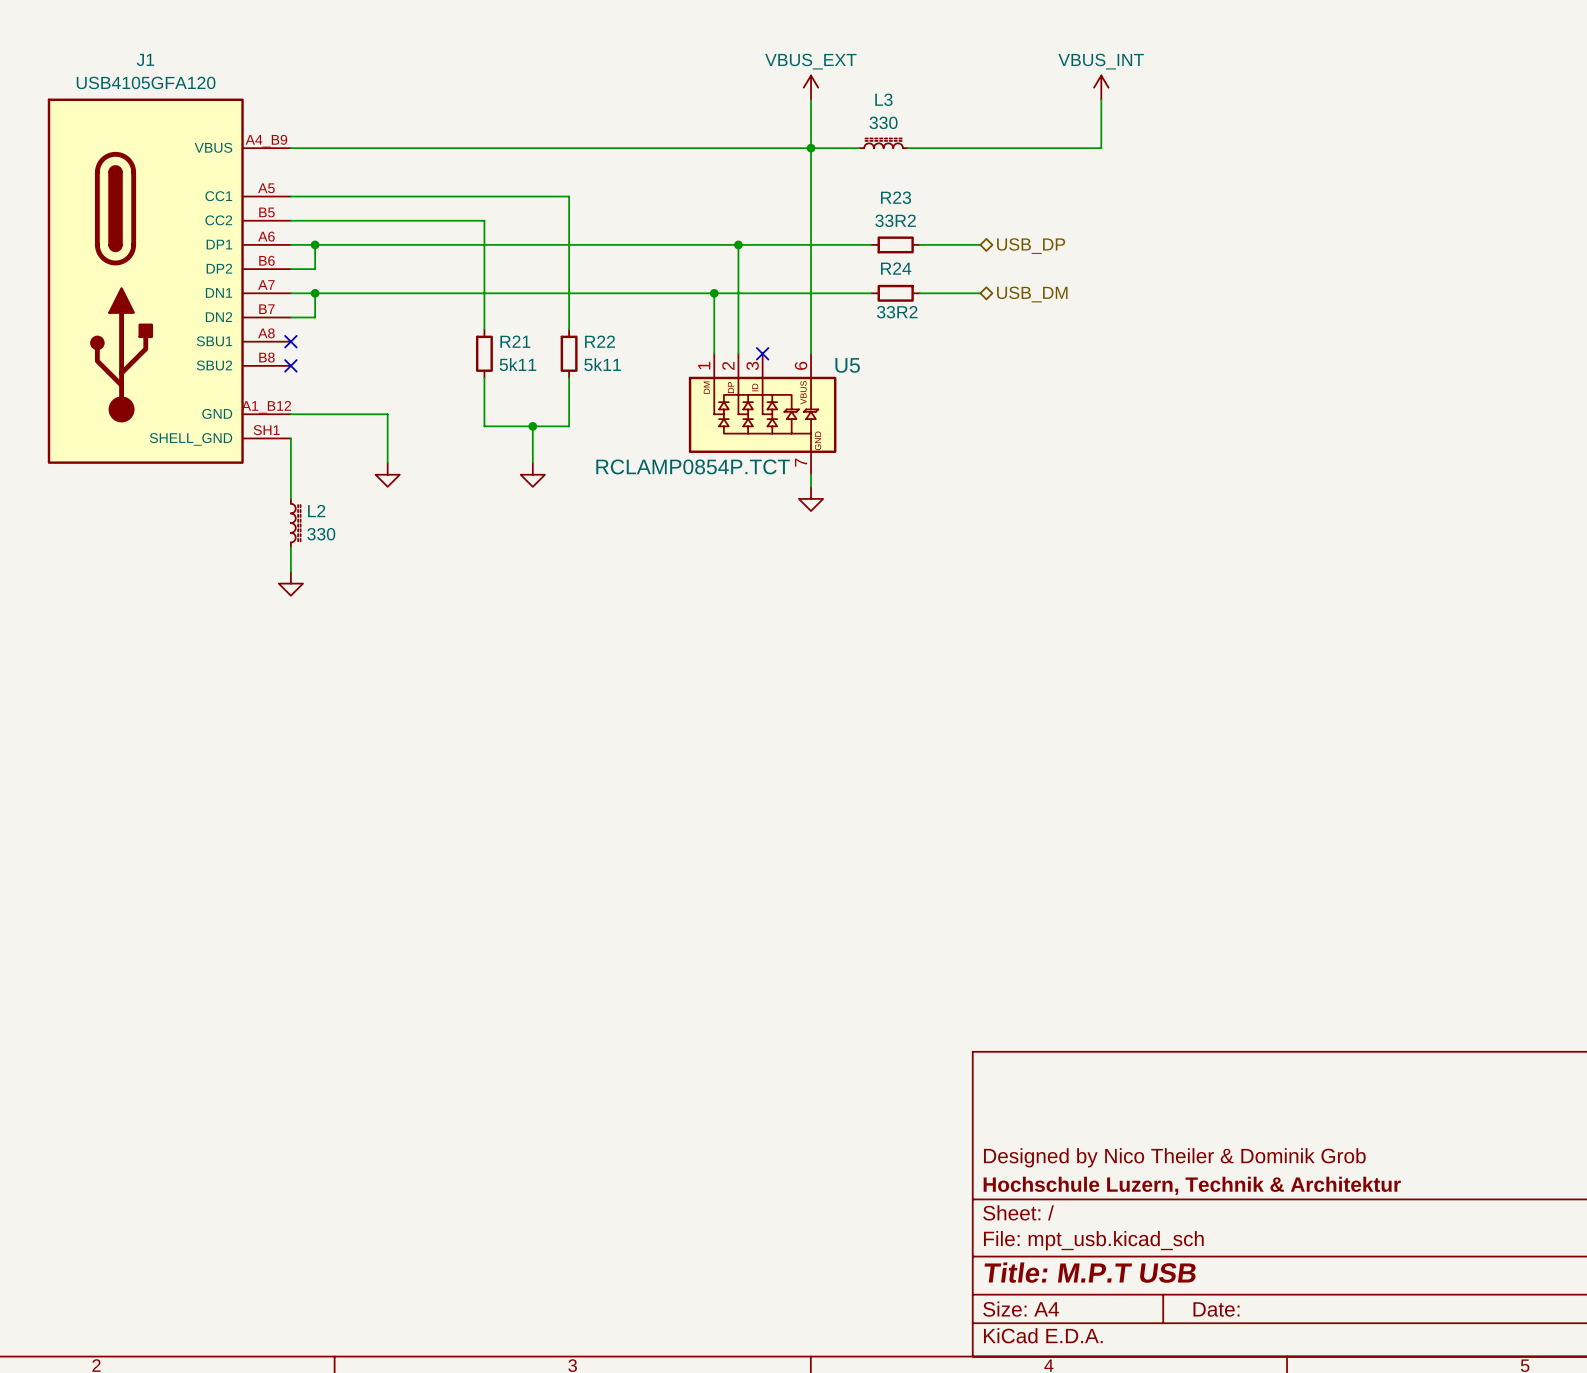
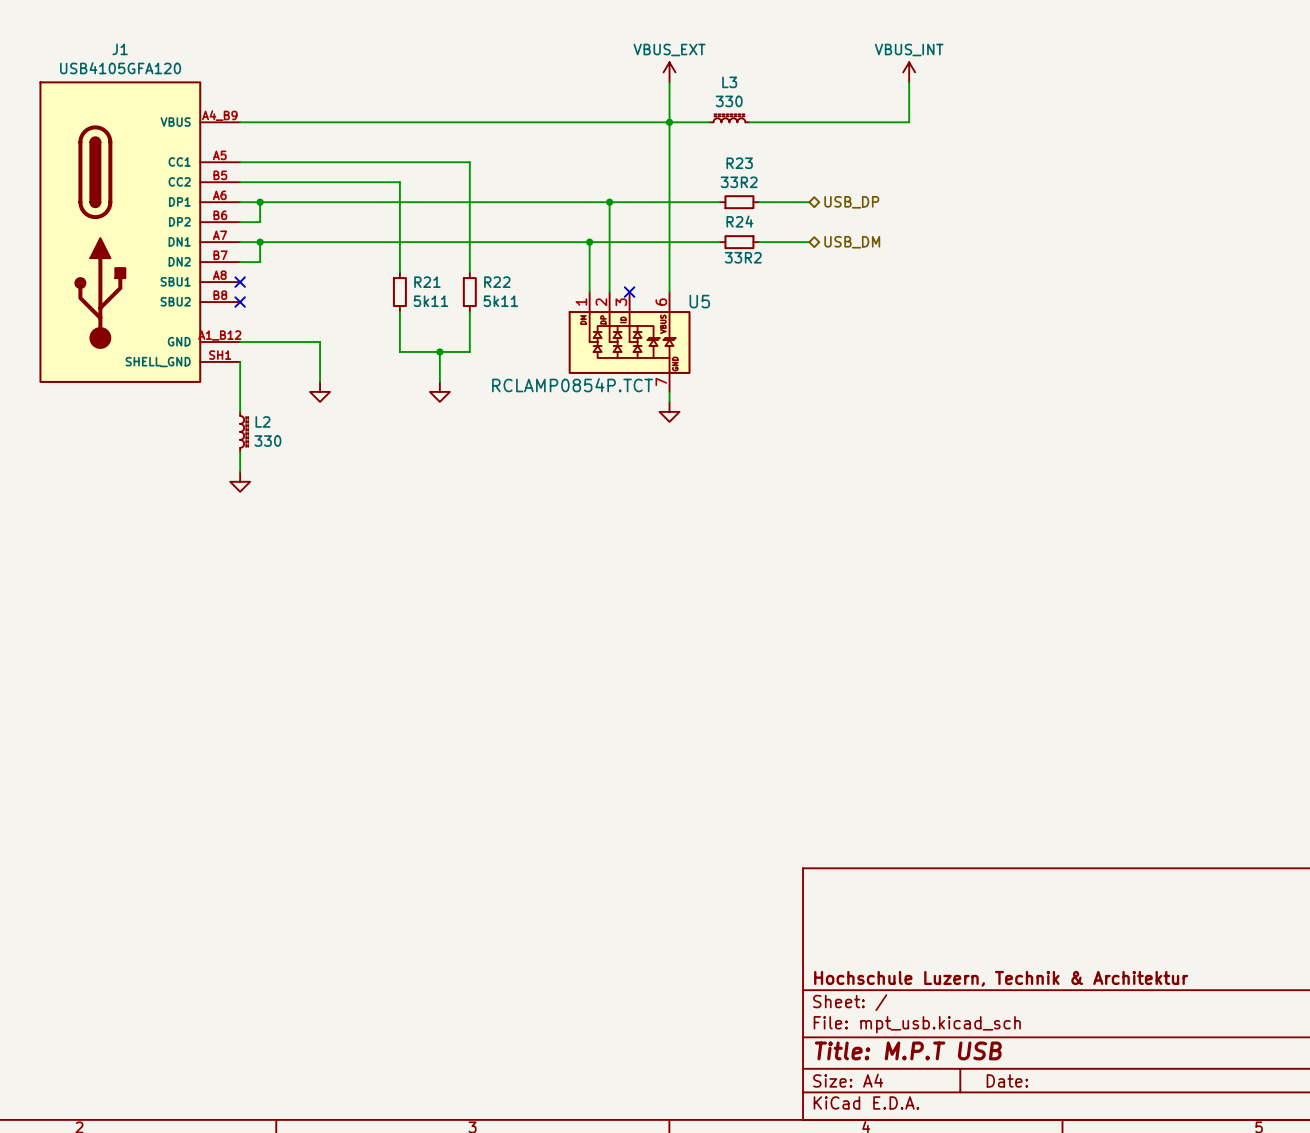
title block: Designed by Nico Theiler & Dominik Grob (1174, 1157) -> none

